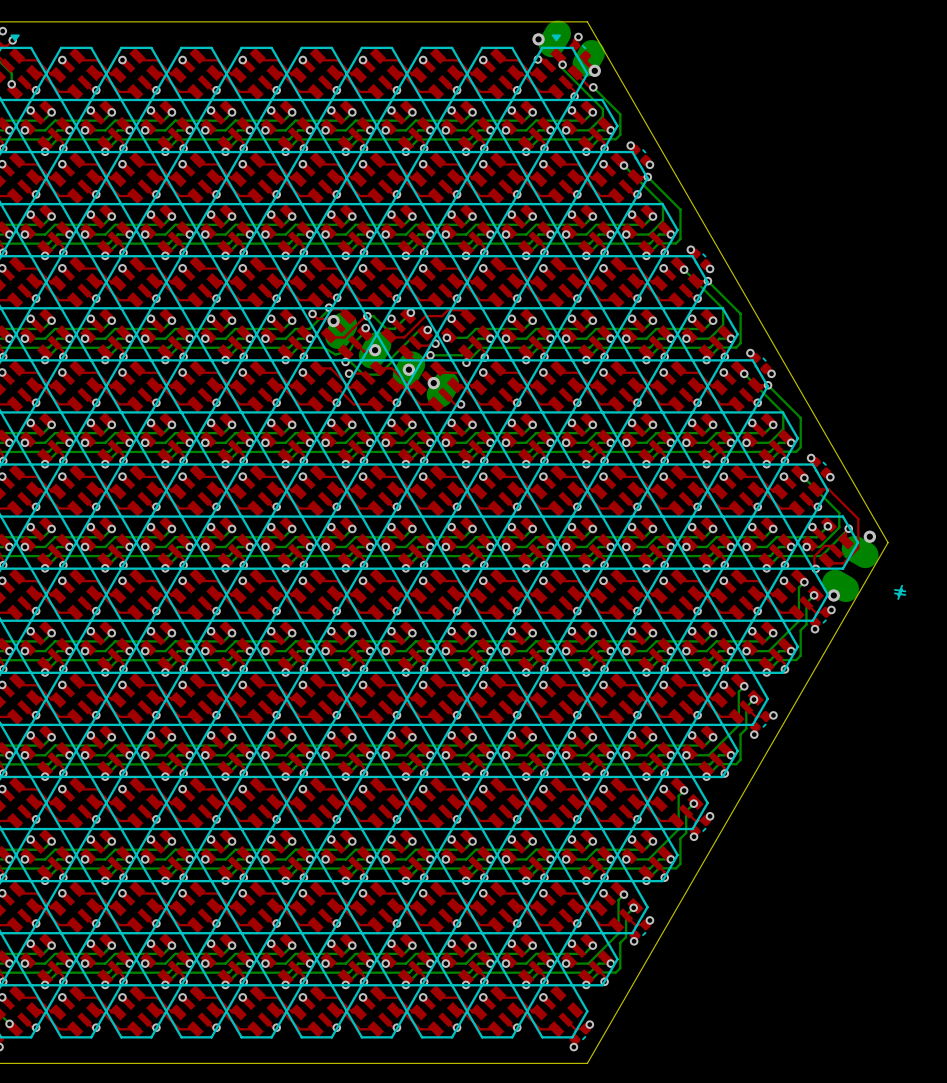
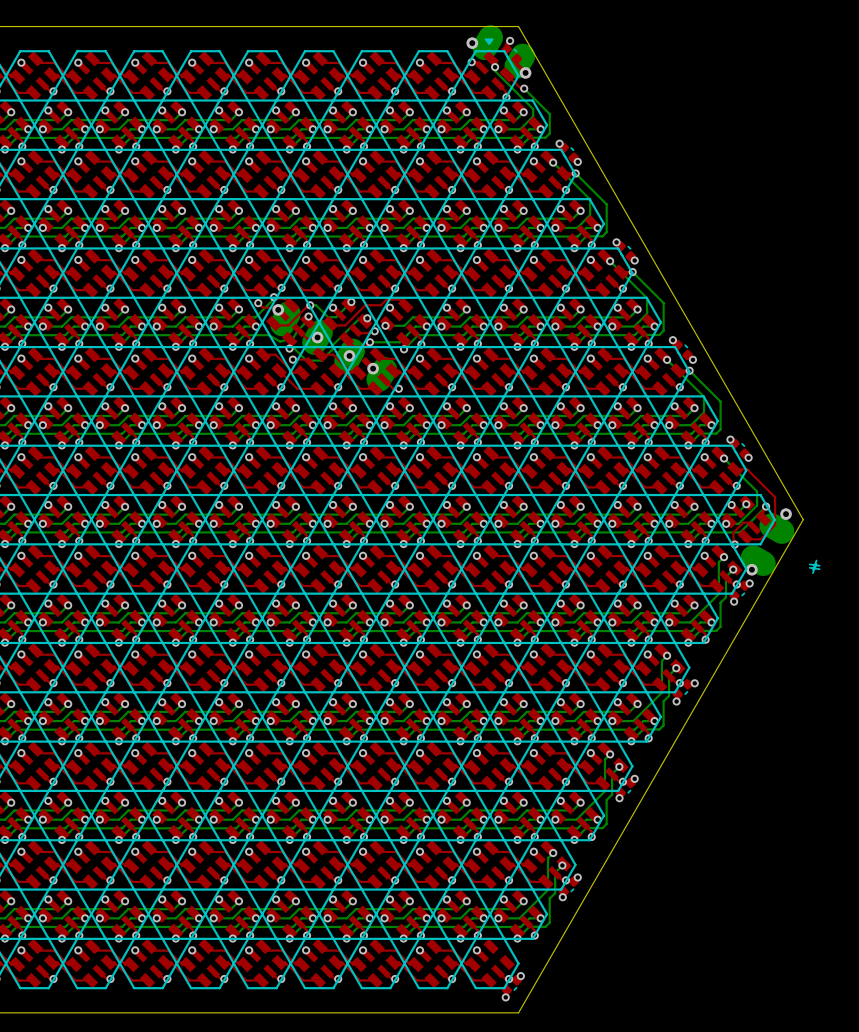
via: none -> (736, 584)
via: none -> (679, 683)
via: none -> (622, 781)
via: none -> (565, 880)
via: none -> (509, 979)

